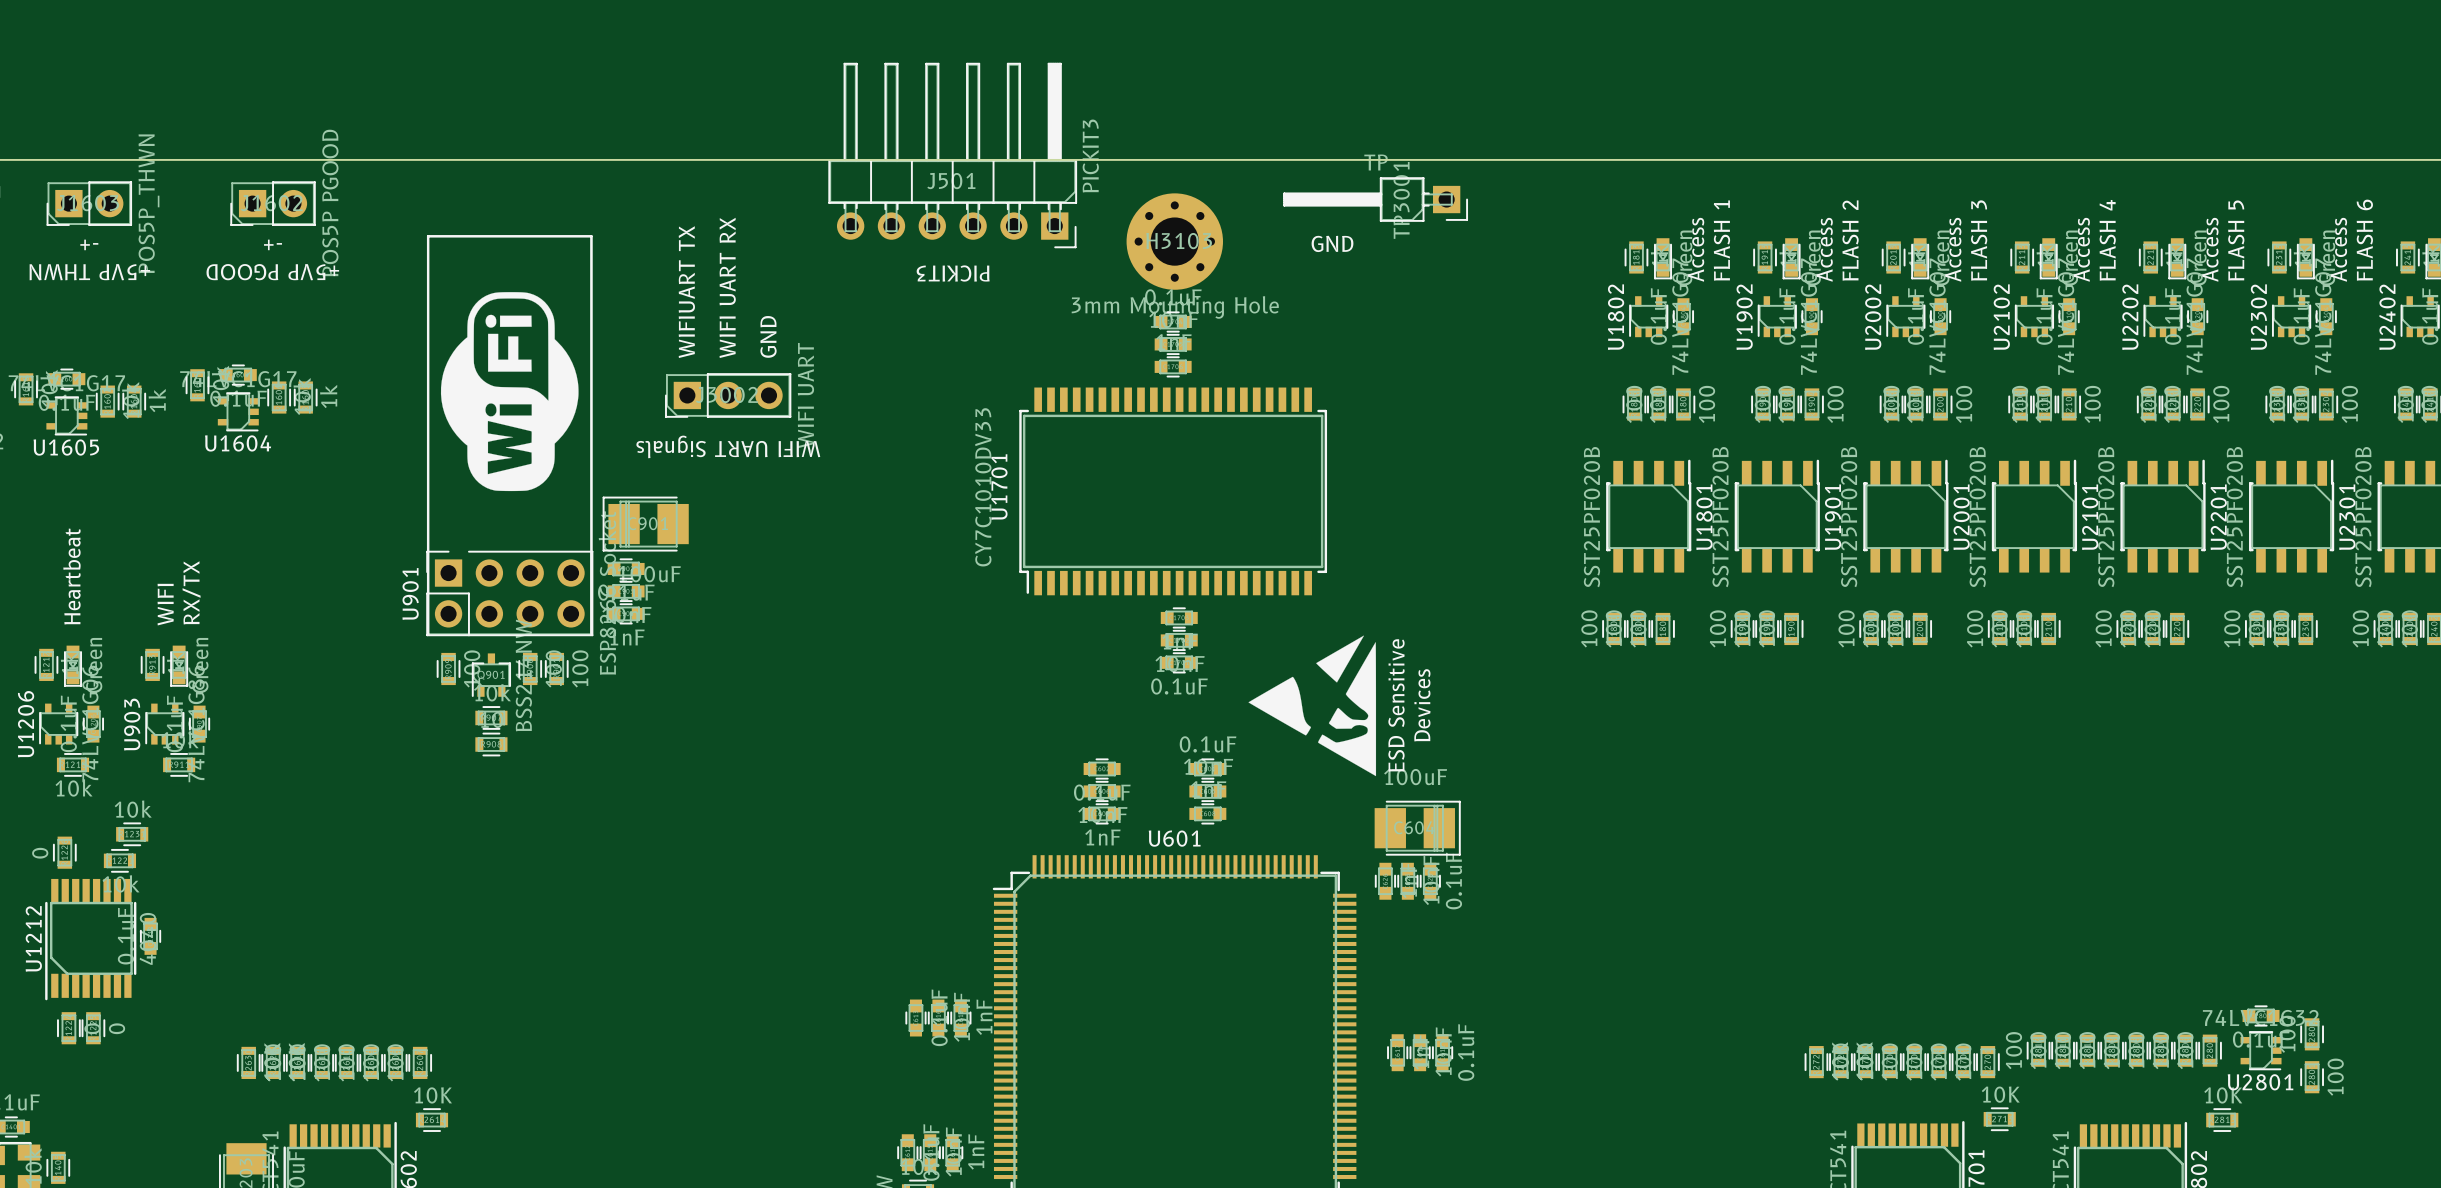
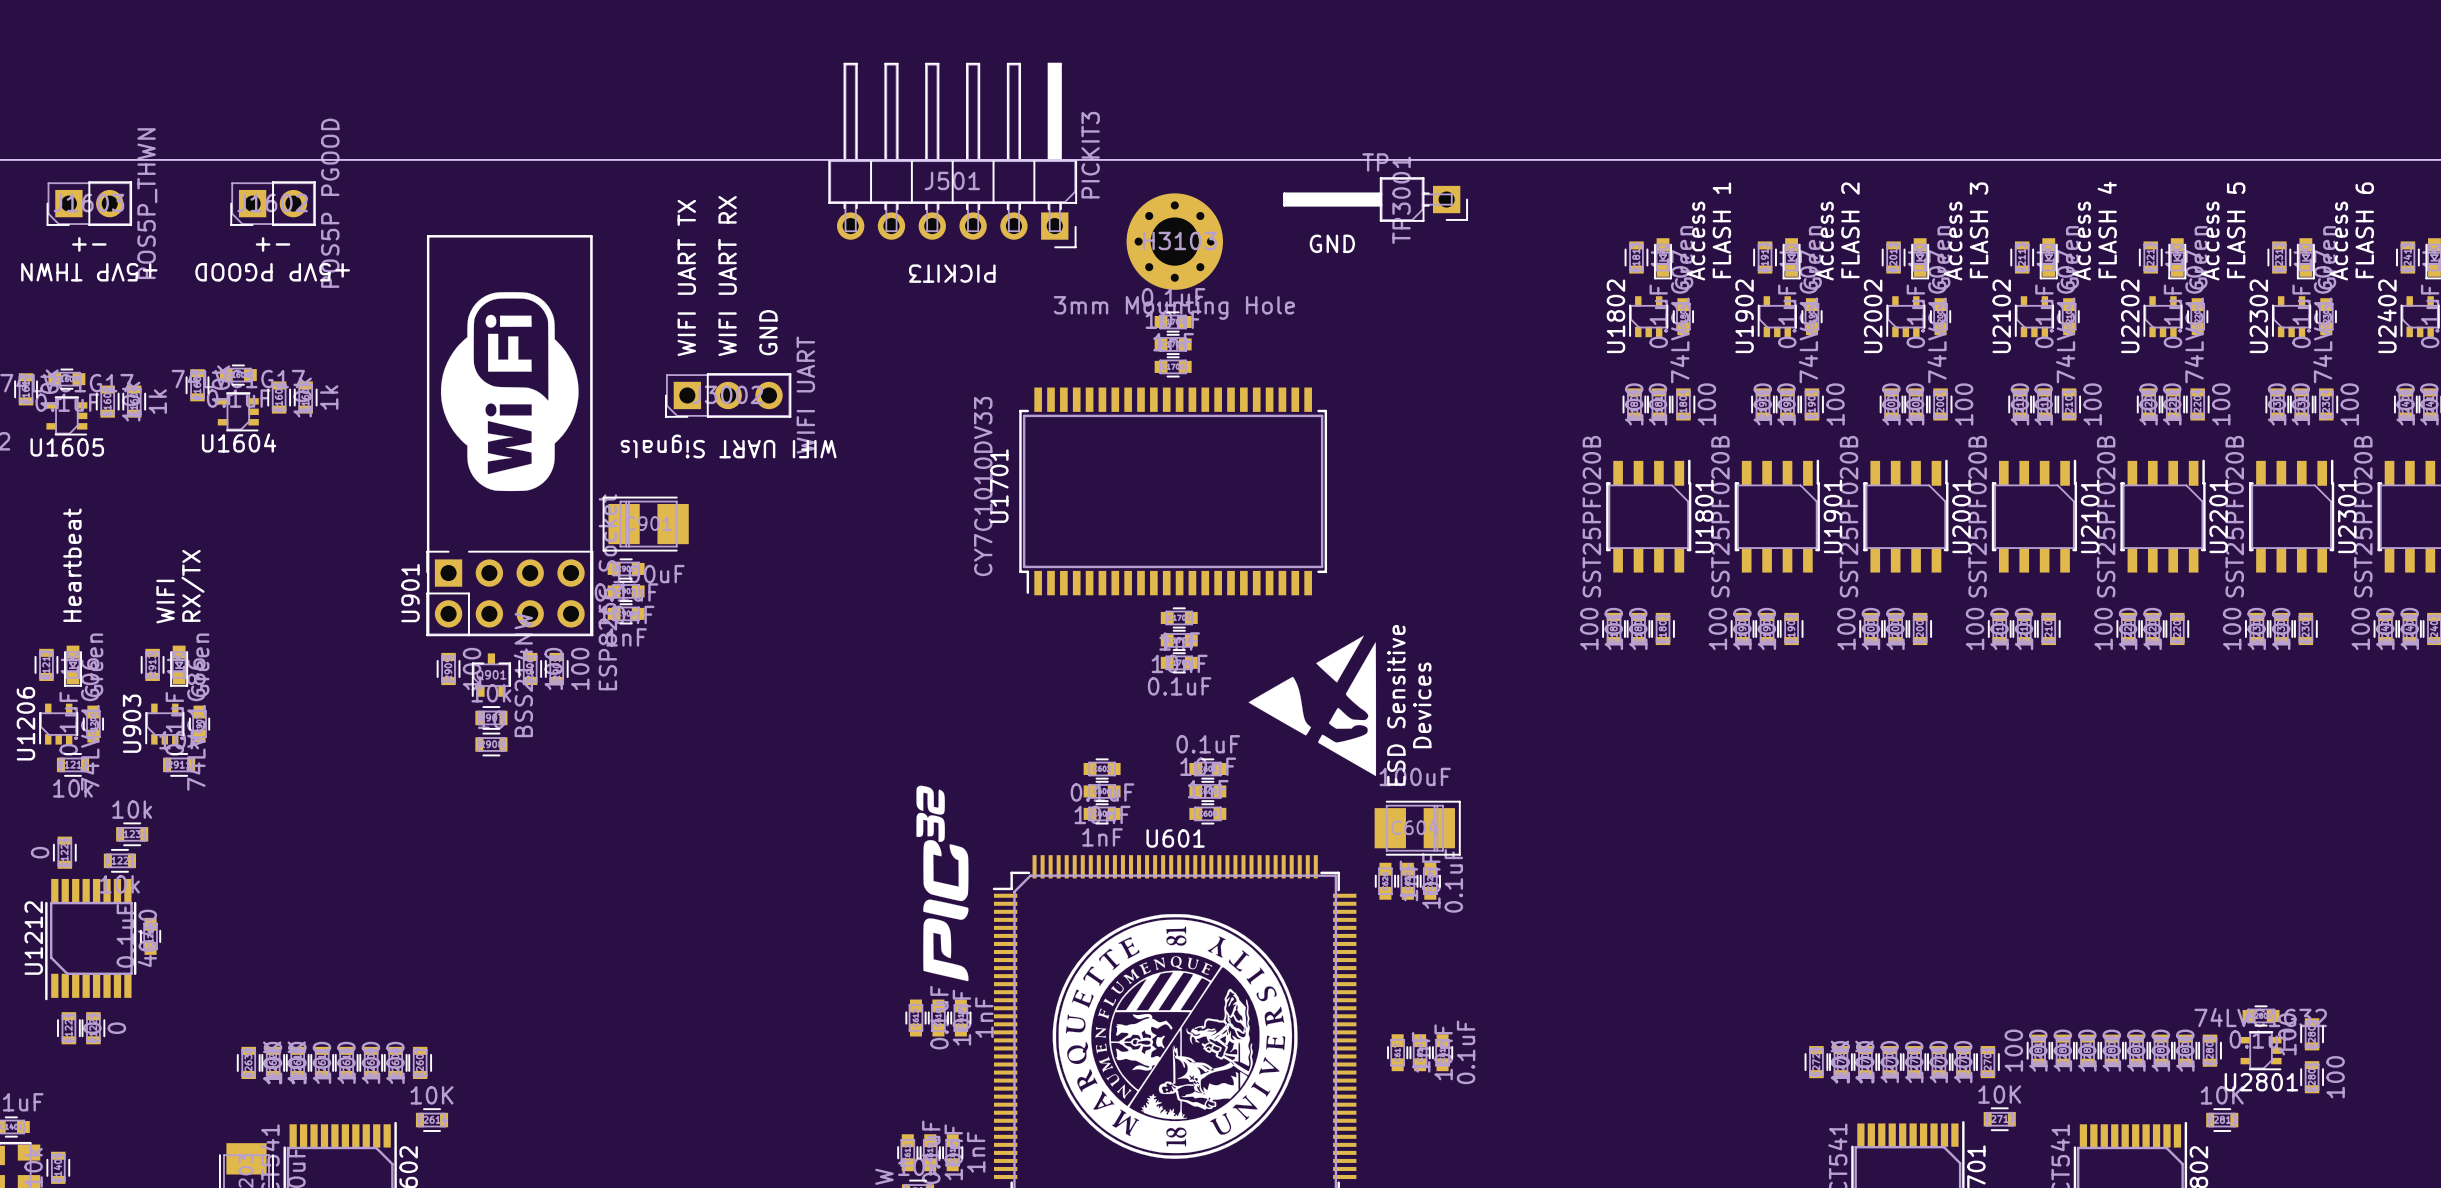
text: WIFIUART TX (686, 292) -> WIFI UART TX (686, 277)
drawing: none -> [916, 785, 969, 982]
drawing: none -> [1052, 914, 1298, 1159]

